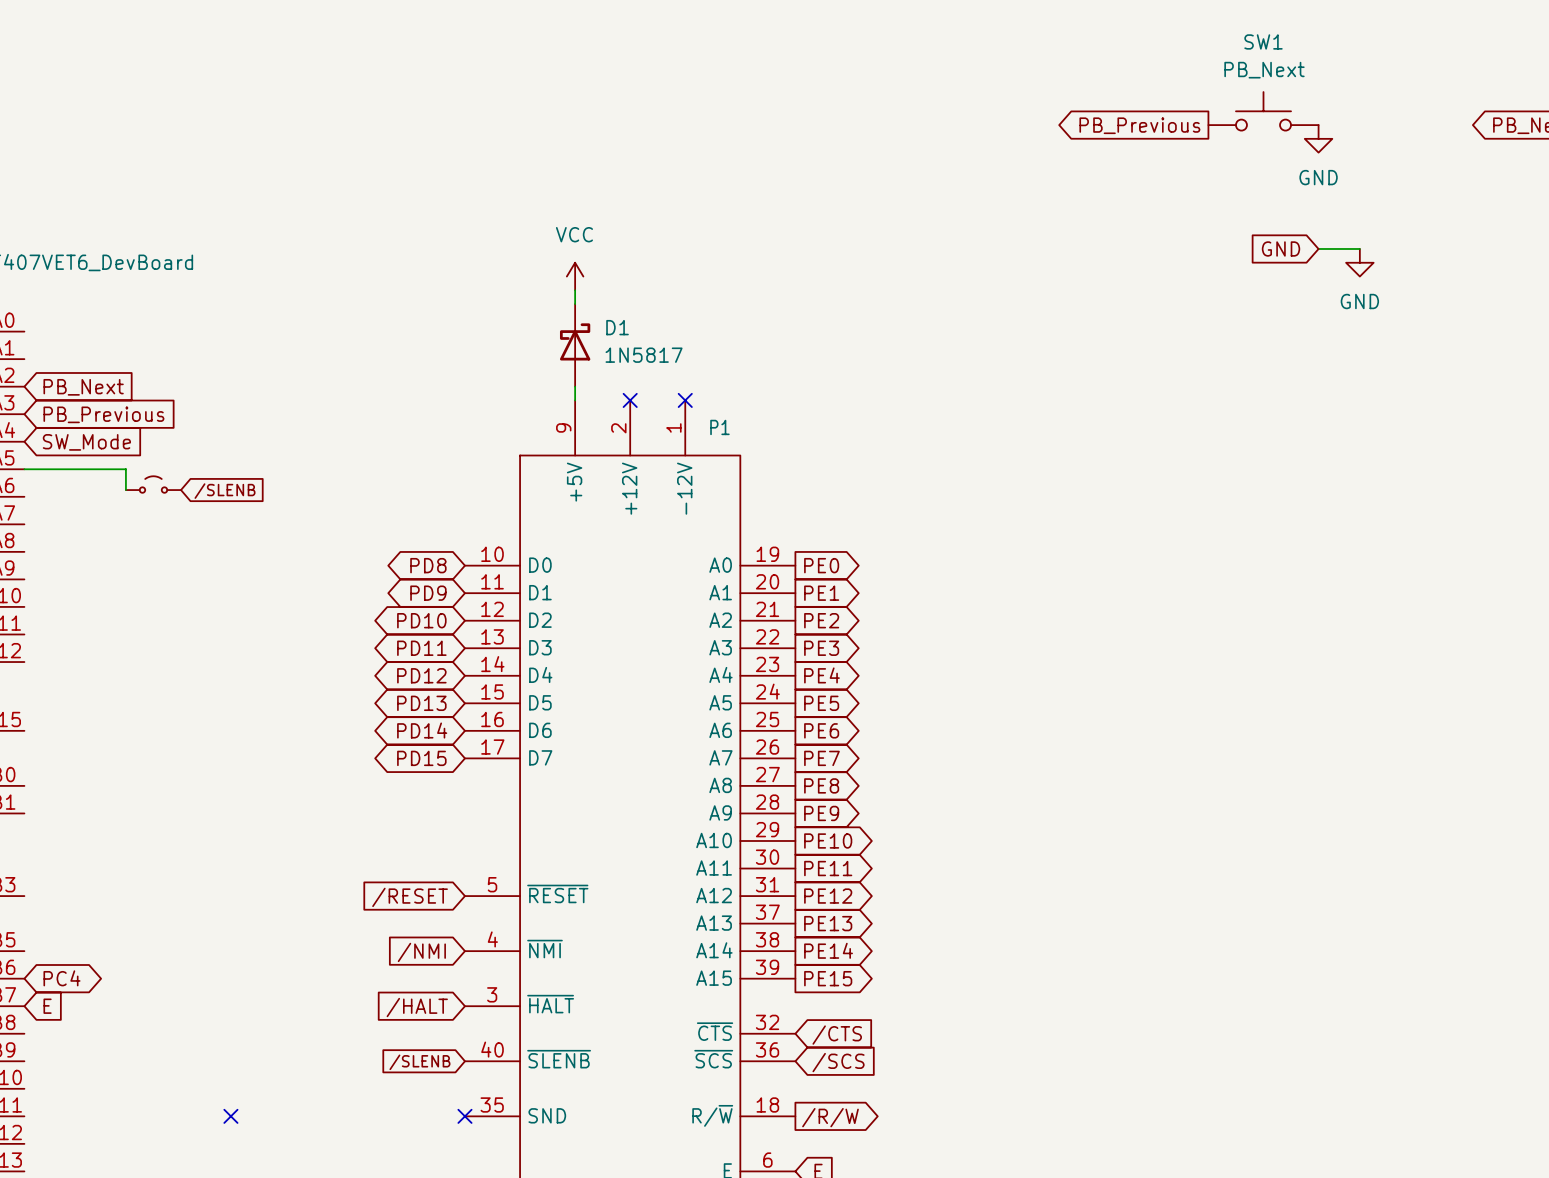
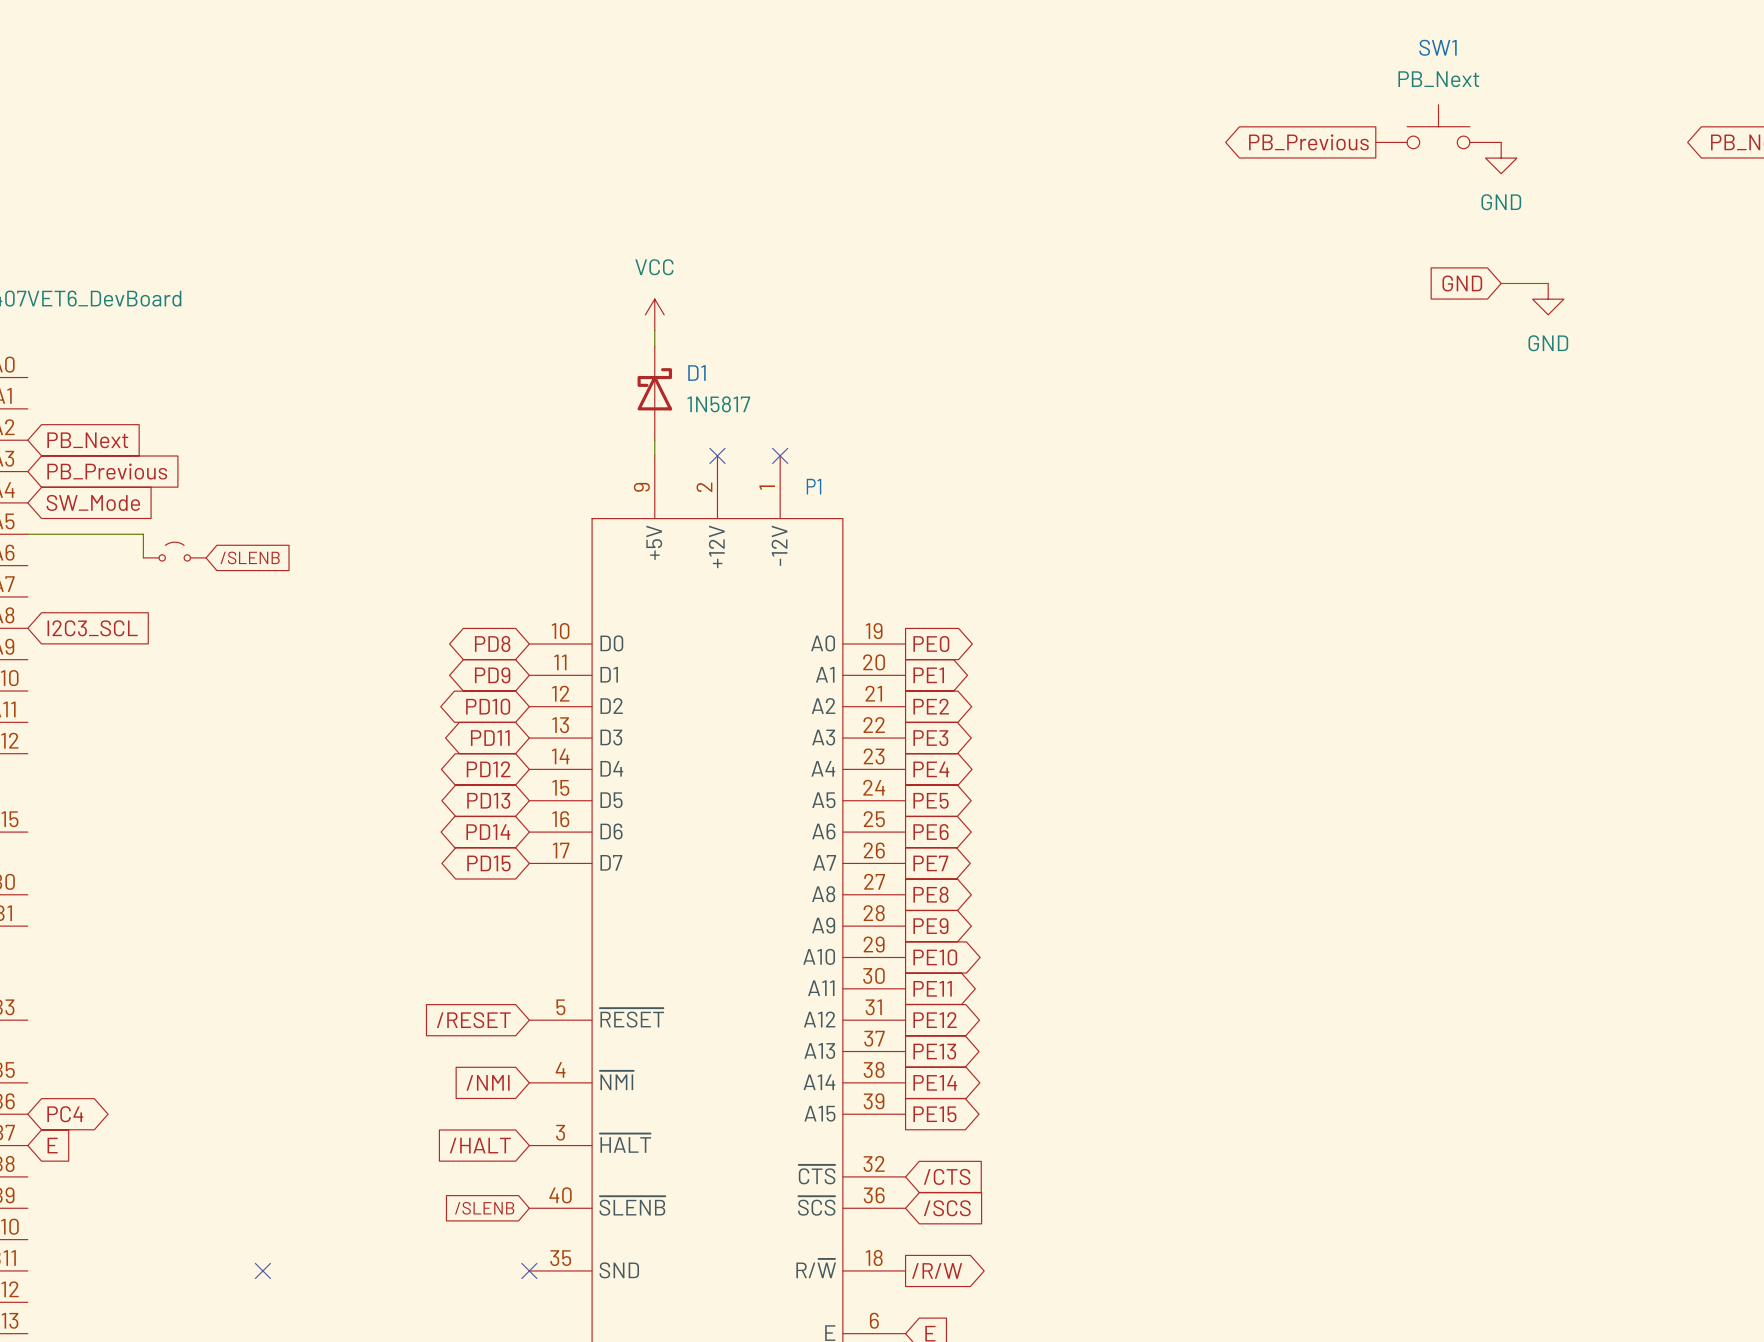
global label: none -> I2C3_SCL (92, 628)

